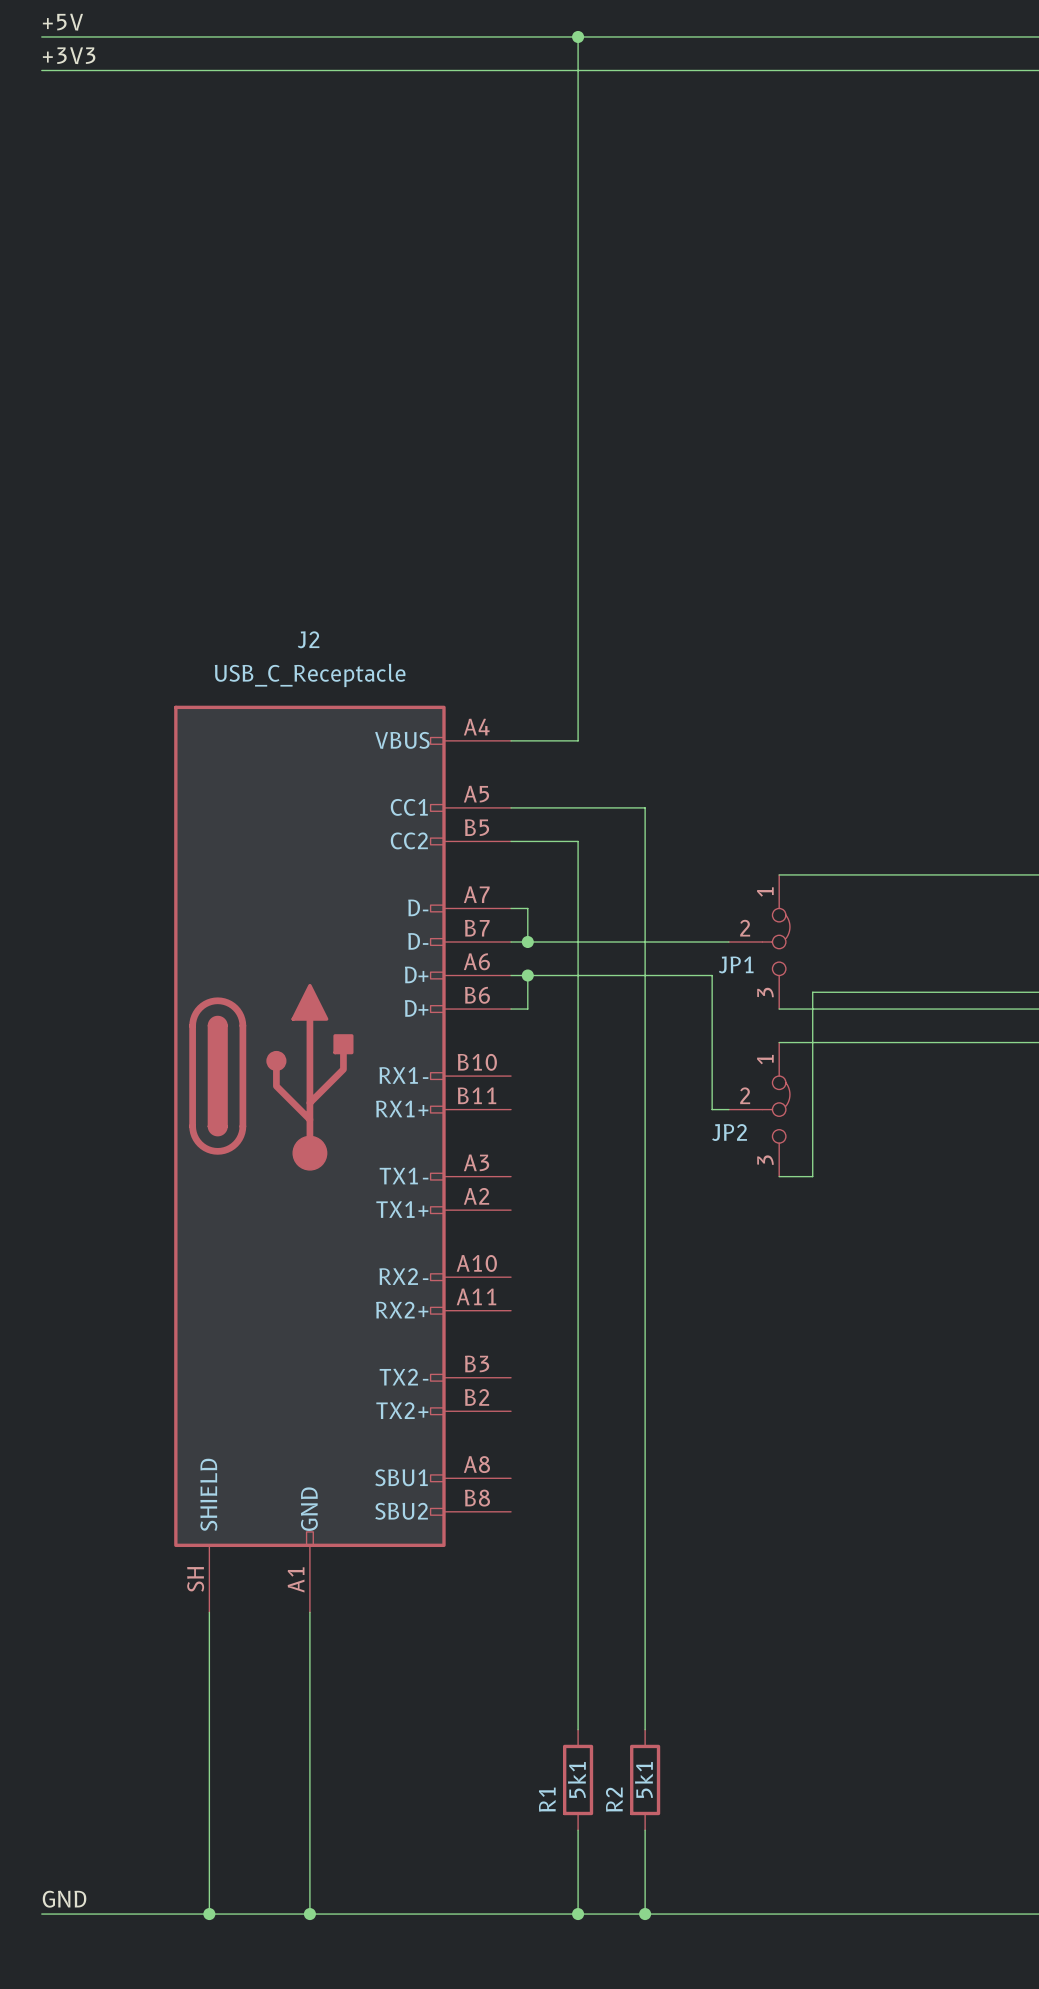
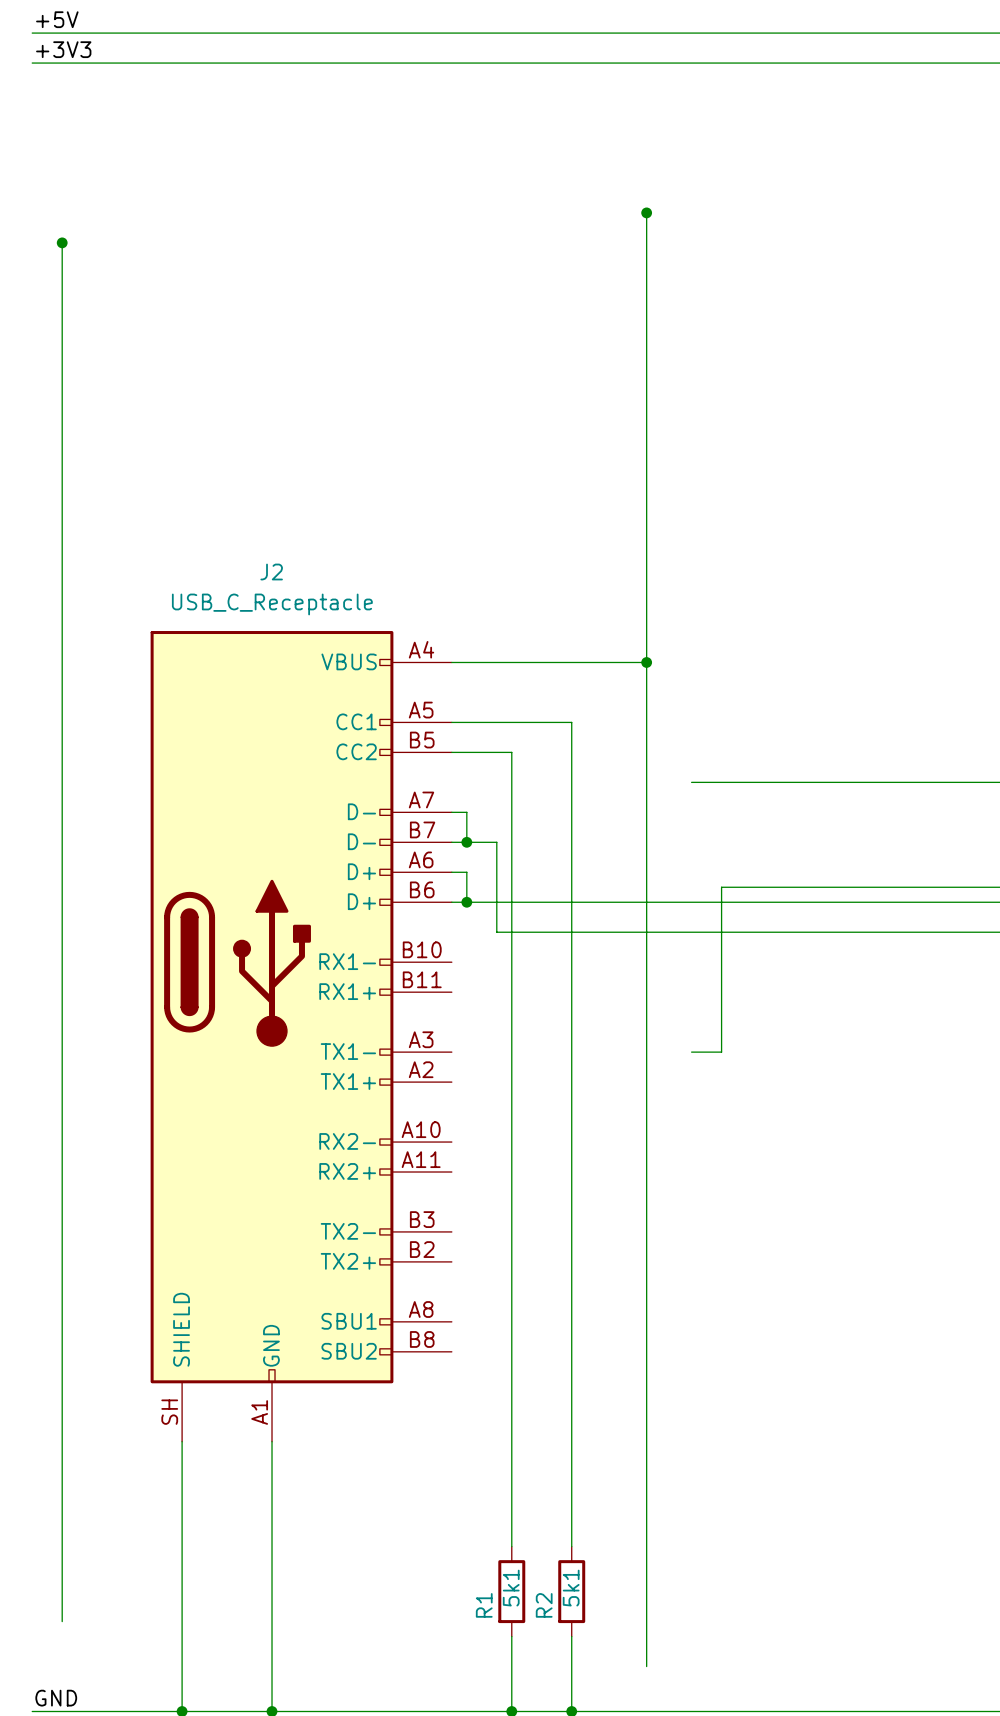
wire: (578, 36) (578, 740) -> (646, 662) (511, 662)
junction: (578, 36) -> none
wire: none -> (646, 212) (646, 1666)
junction: none -> (646, 212)
wire: none -> (62, 242) (62, 1621)
junction: none -> (62, 242)
junction: none -> (646, 662)
wire: (561, 941) (728, 941) -> (496, 842) (496, 932) (691, 932)
JP1: (759, 941) -> none
wire: (527, 975) (712, 975) (712, 1109) (728, 1109) -> none
junction position: (527, 975) -> (466, 902)
wire: none -> (466, 902) (691, 902)
JP2: (759, 1109) -> none

